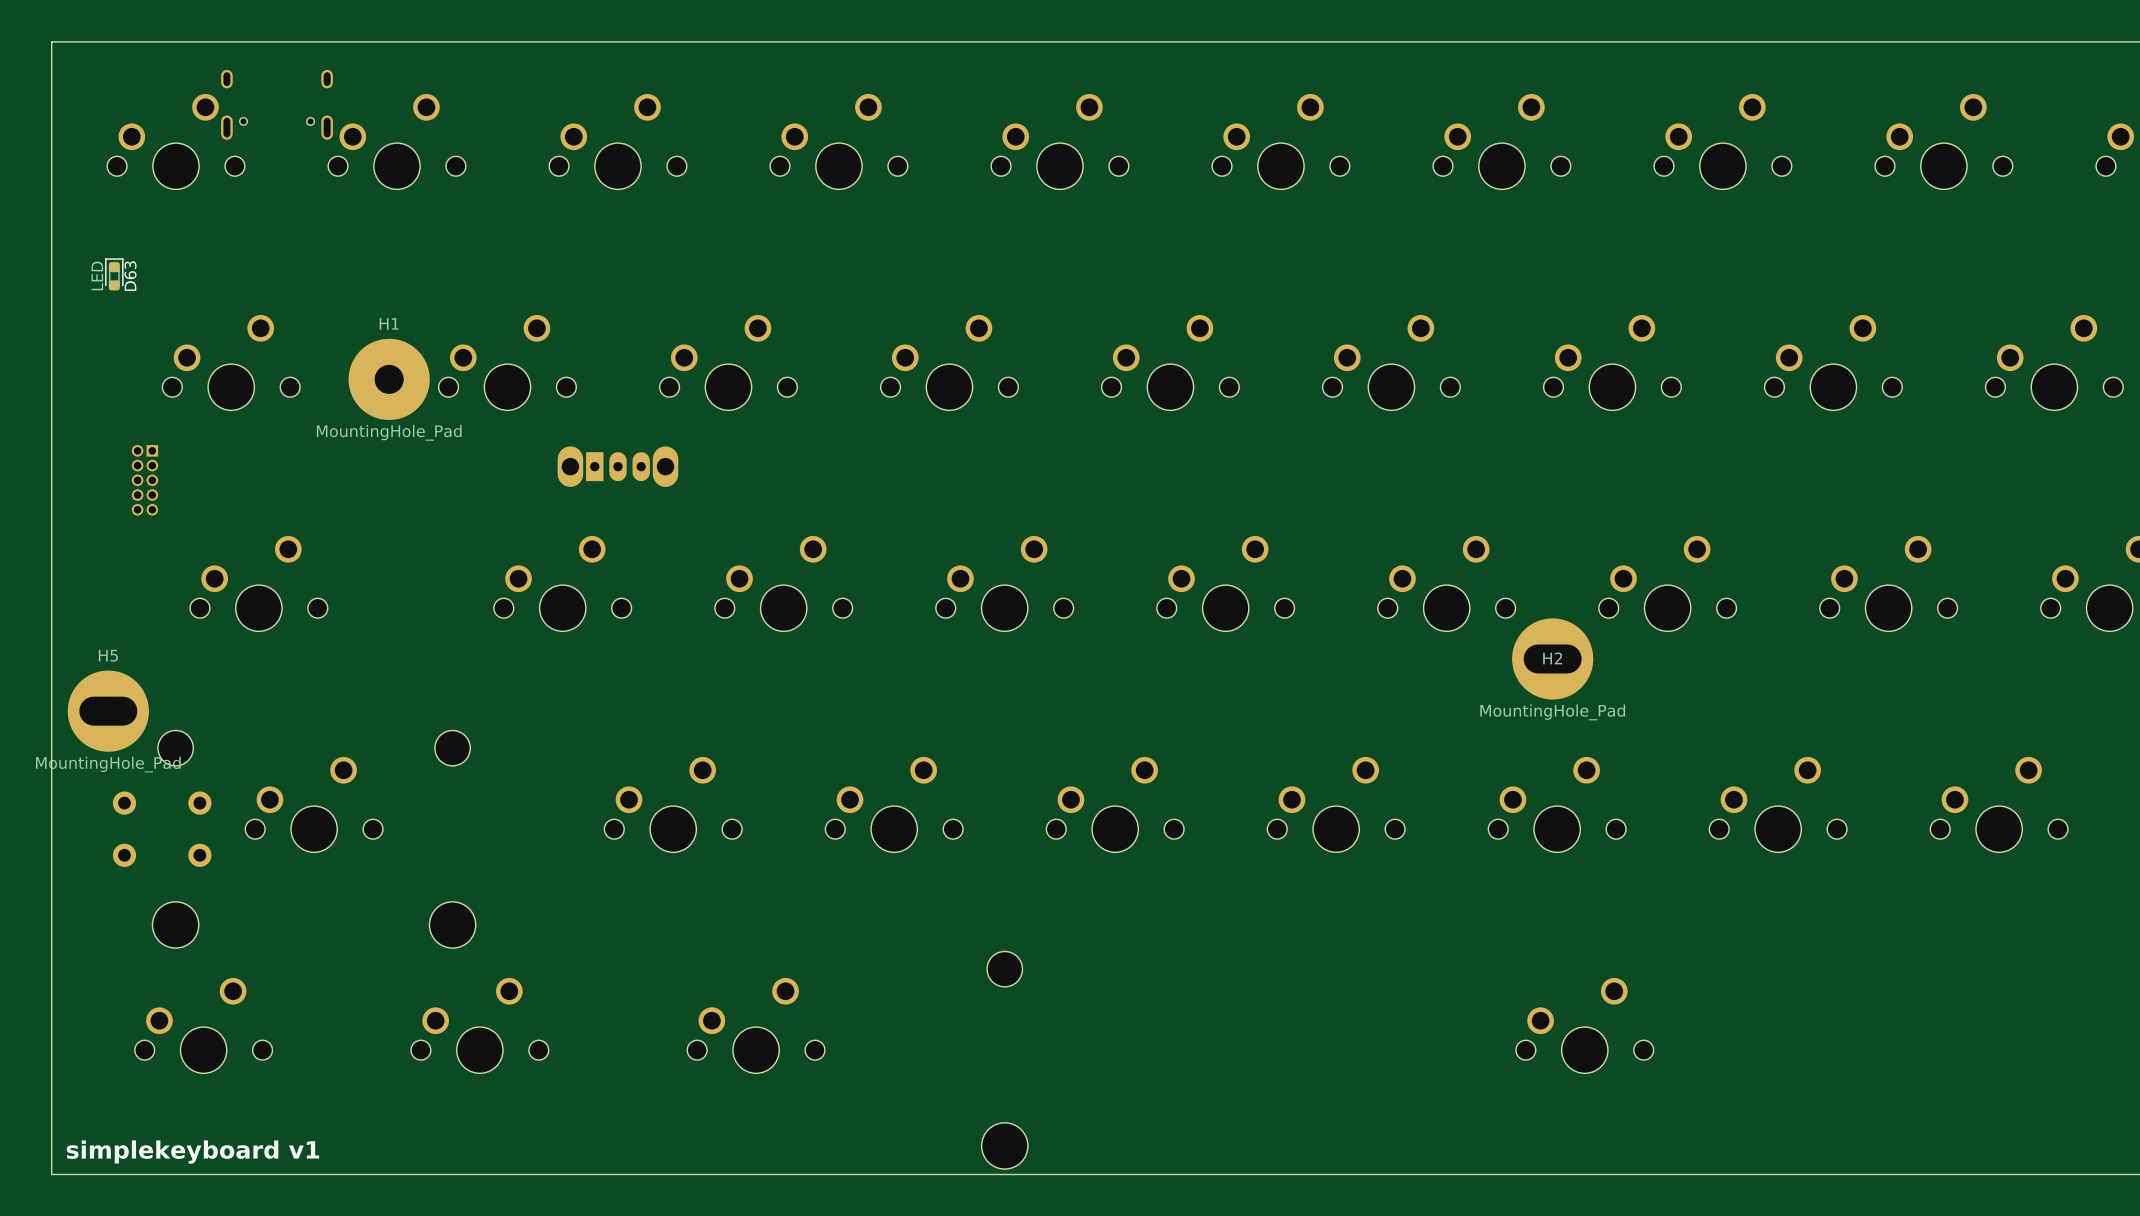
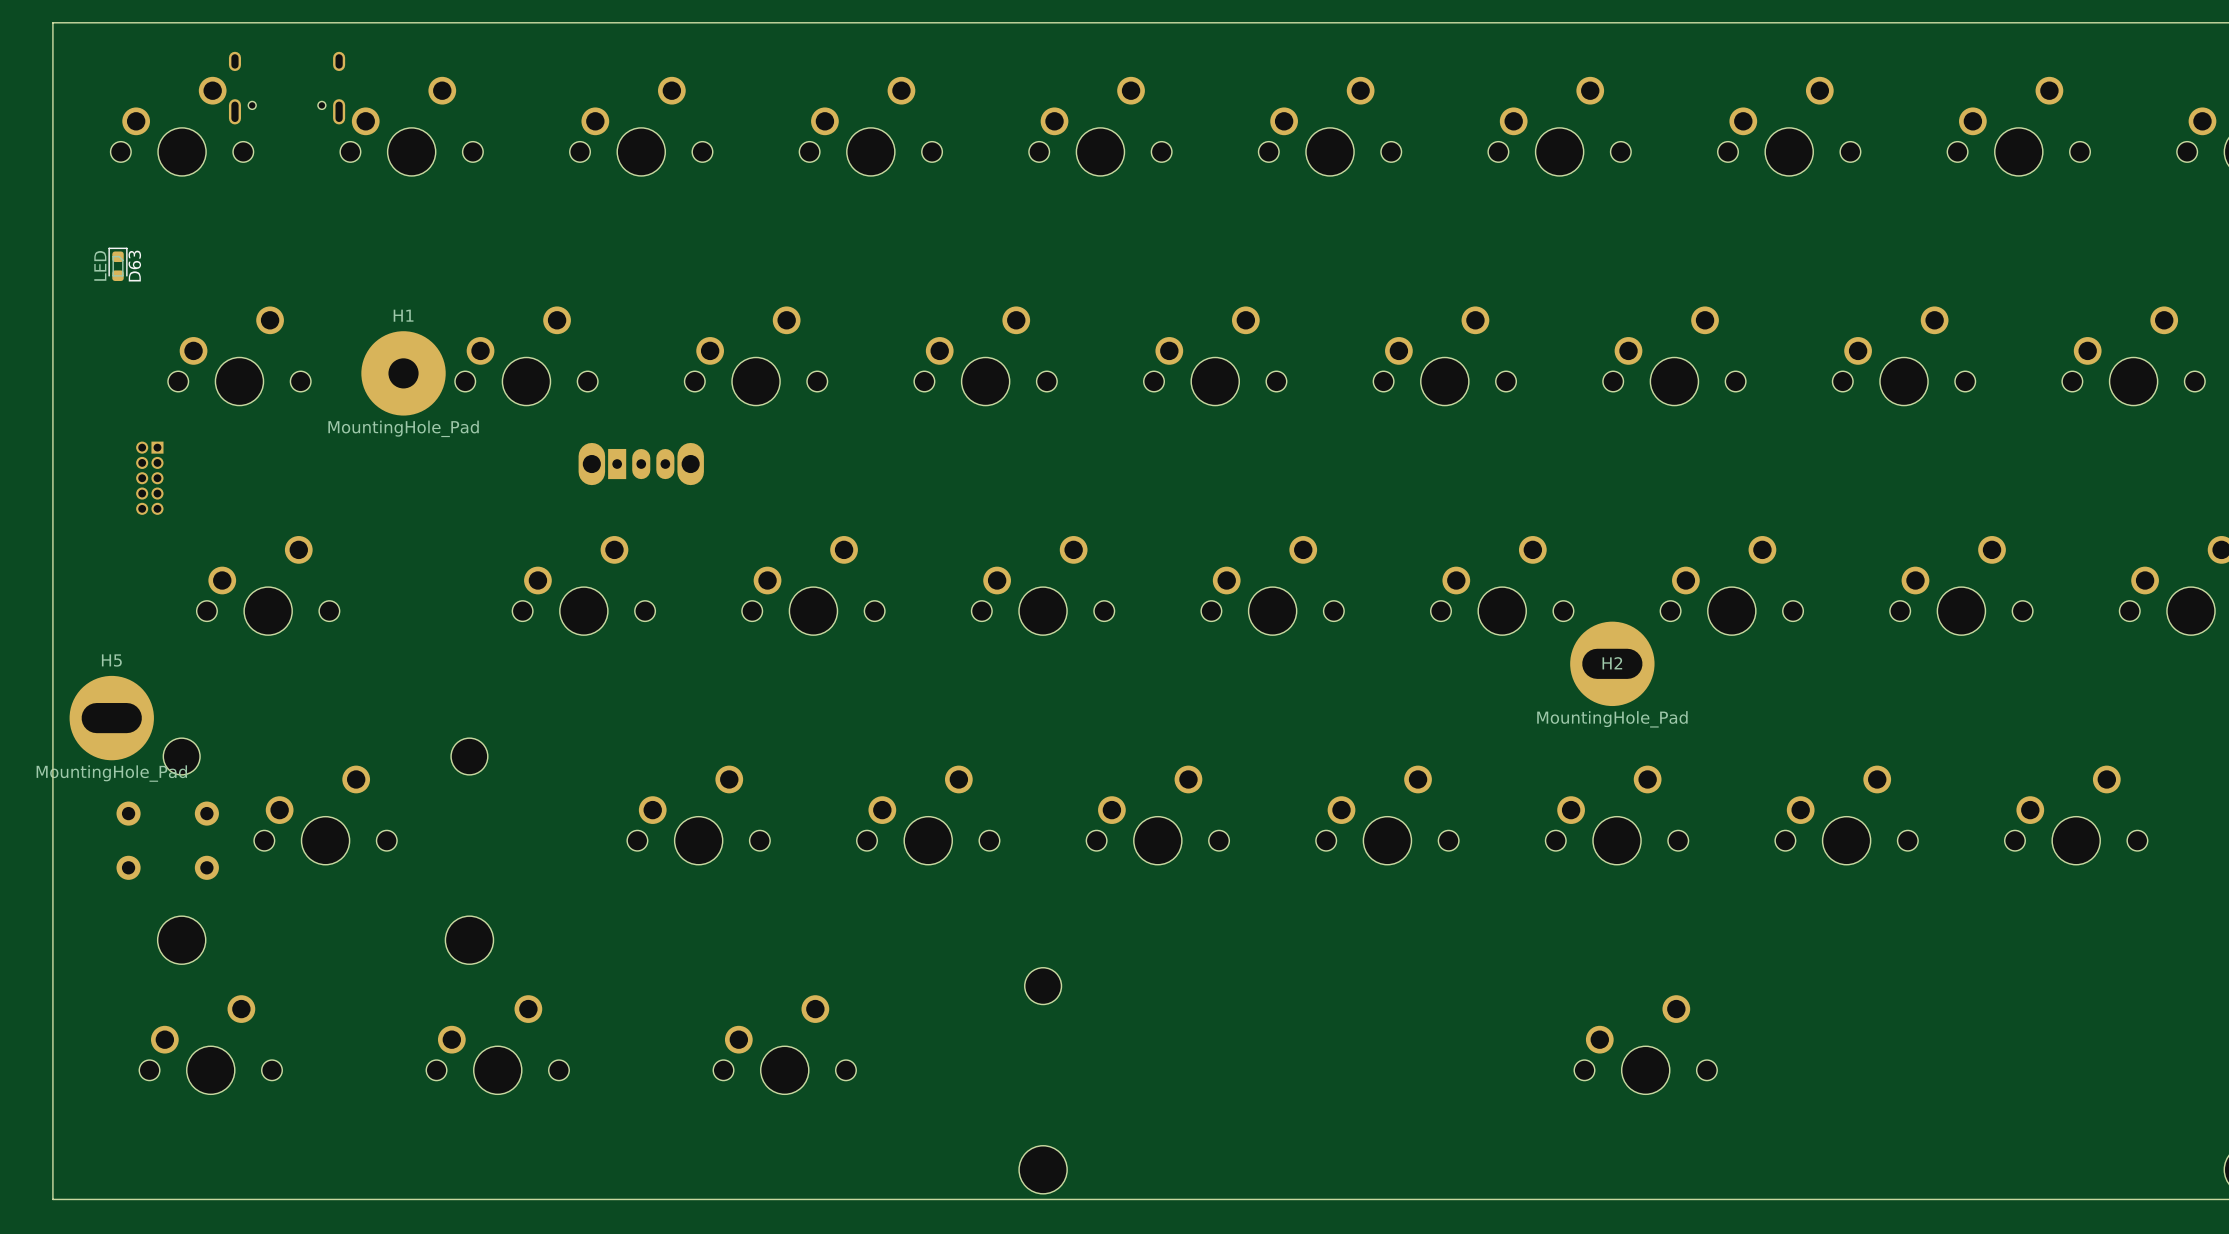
text: simplekeyboard v1 (192, 1152) -> none

